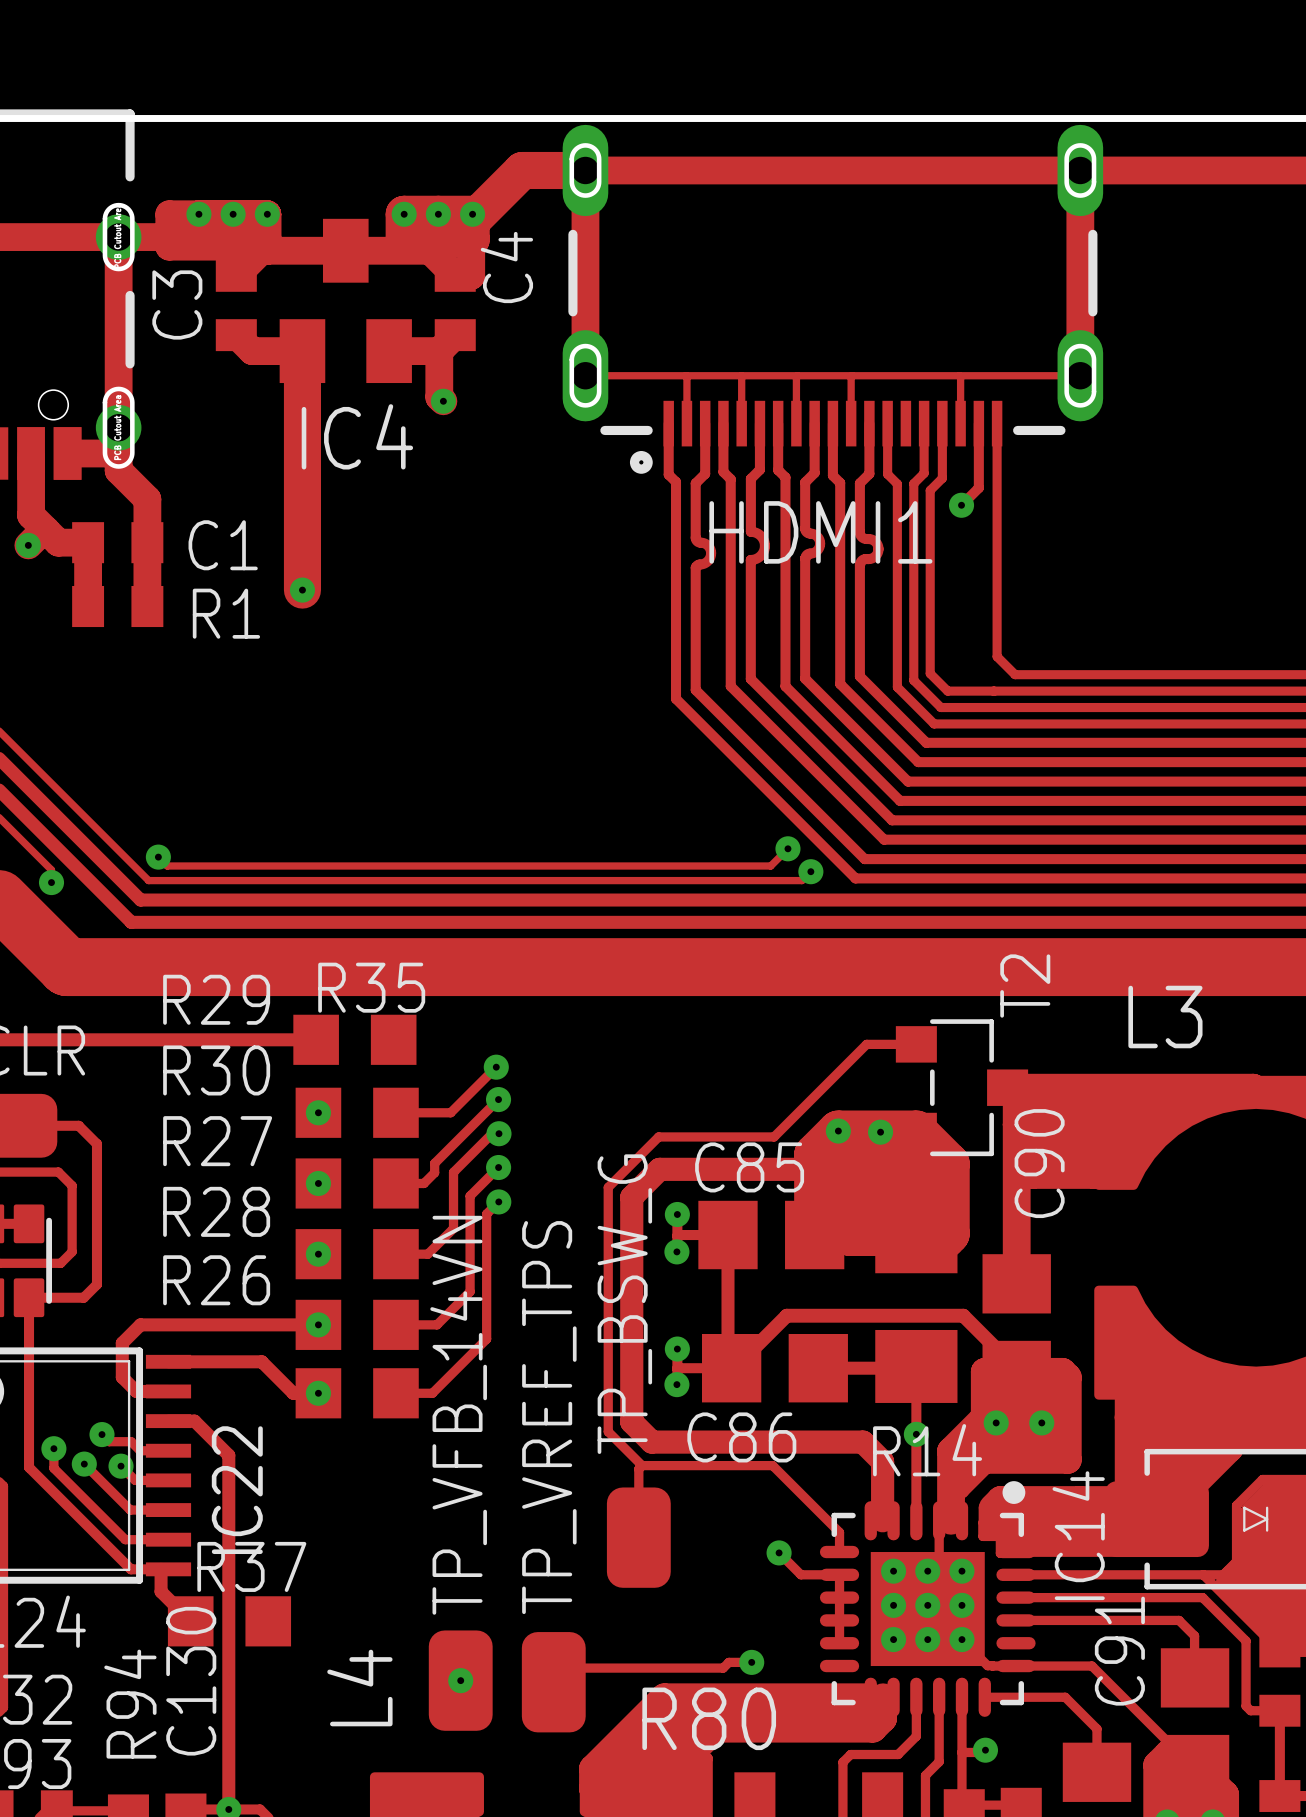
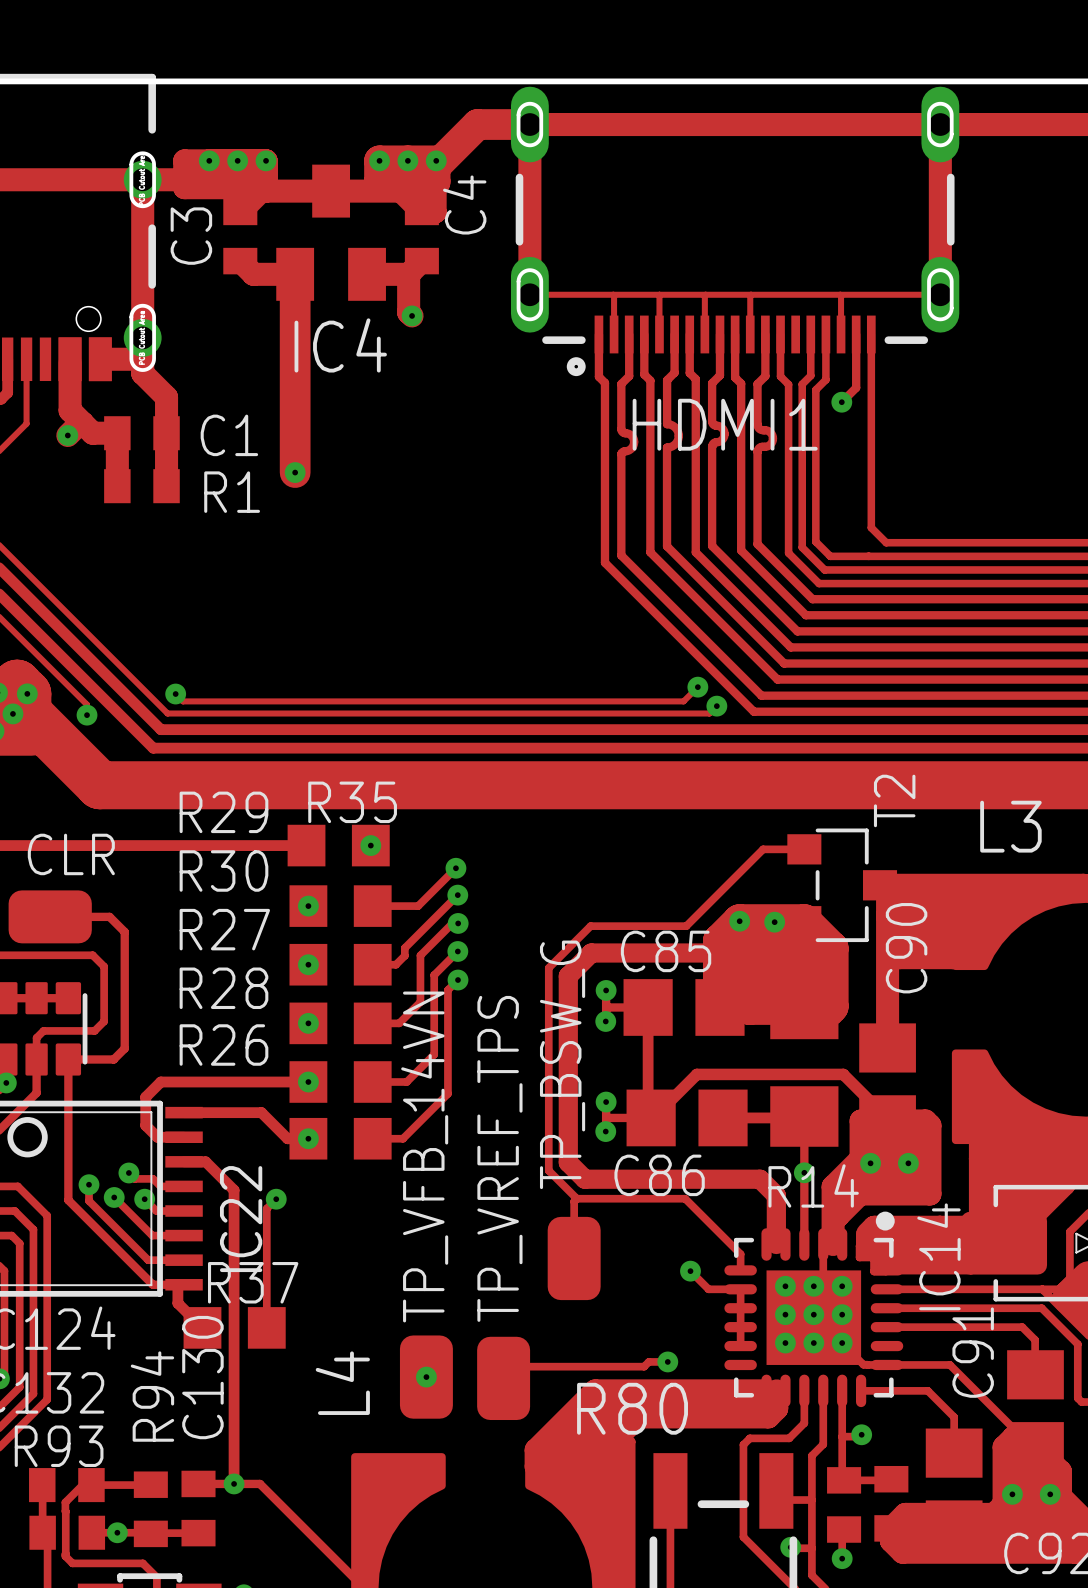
via: none -> (370, 845)
track: none -> (276, 1199) (266, 1208) (266, 1327)
via: none -> (276, 1199)

